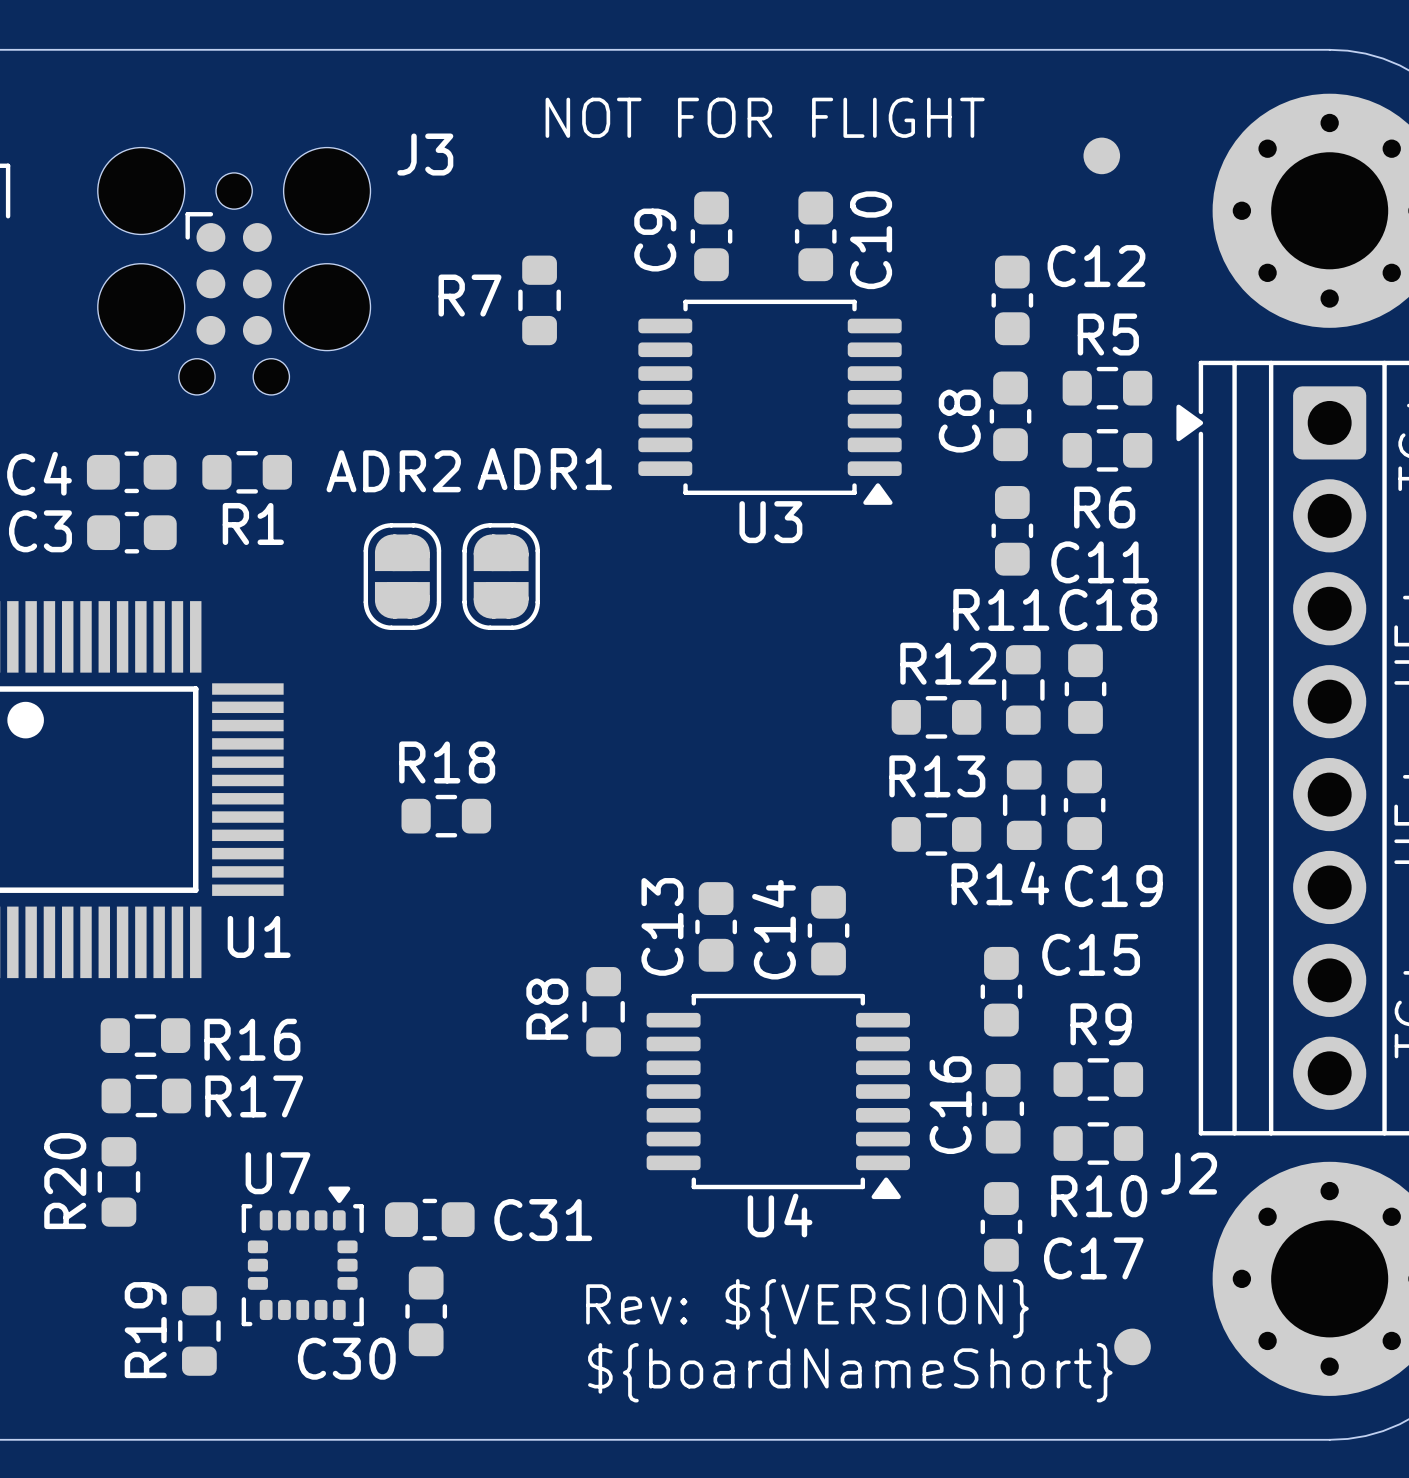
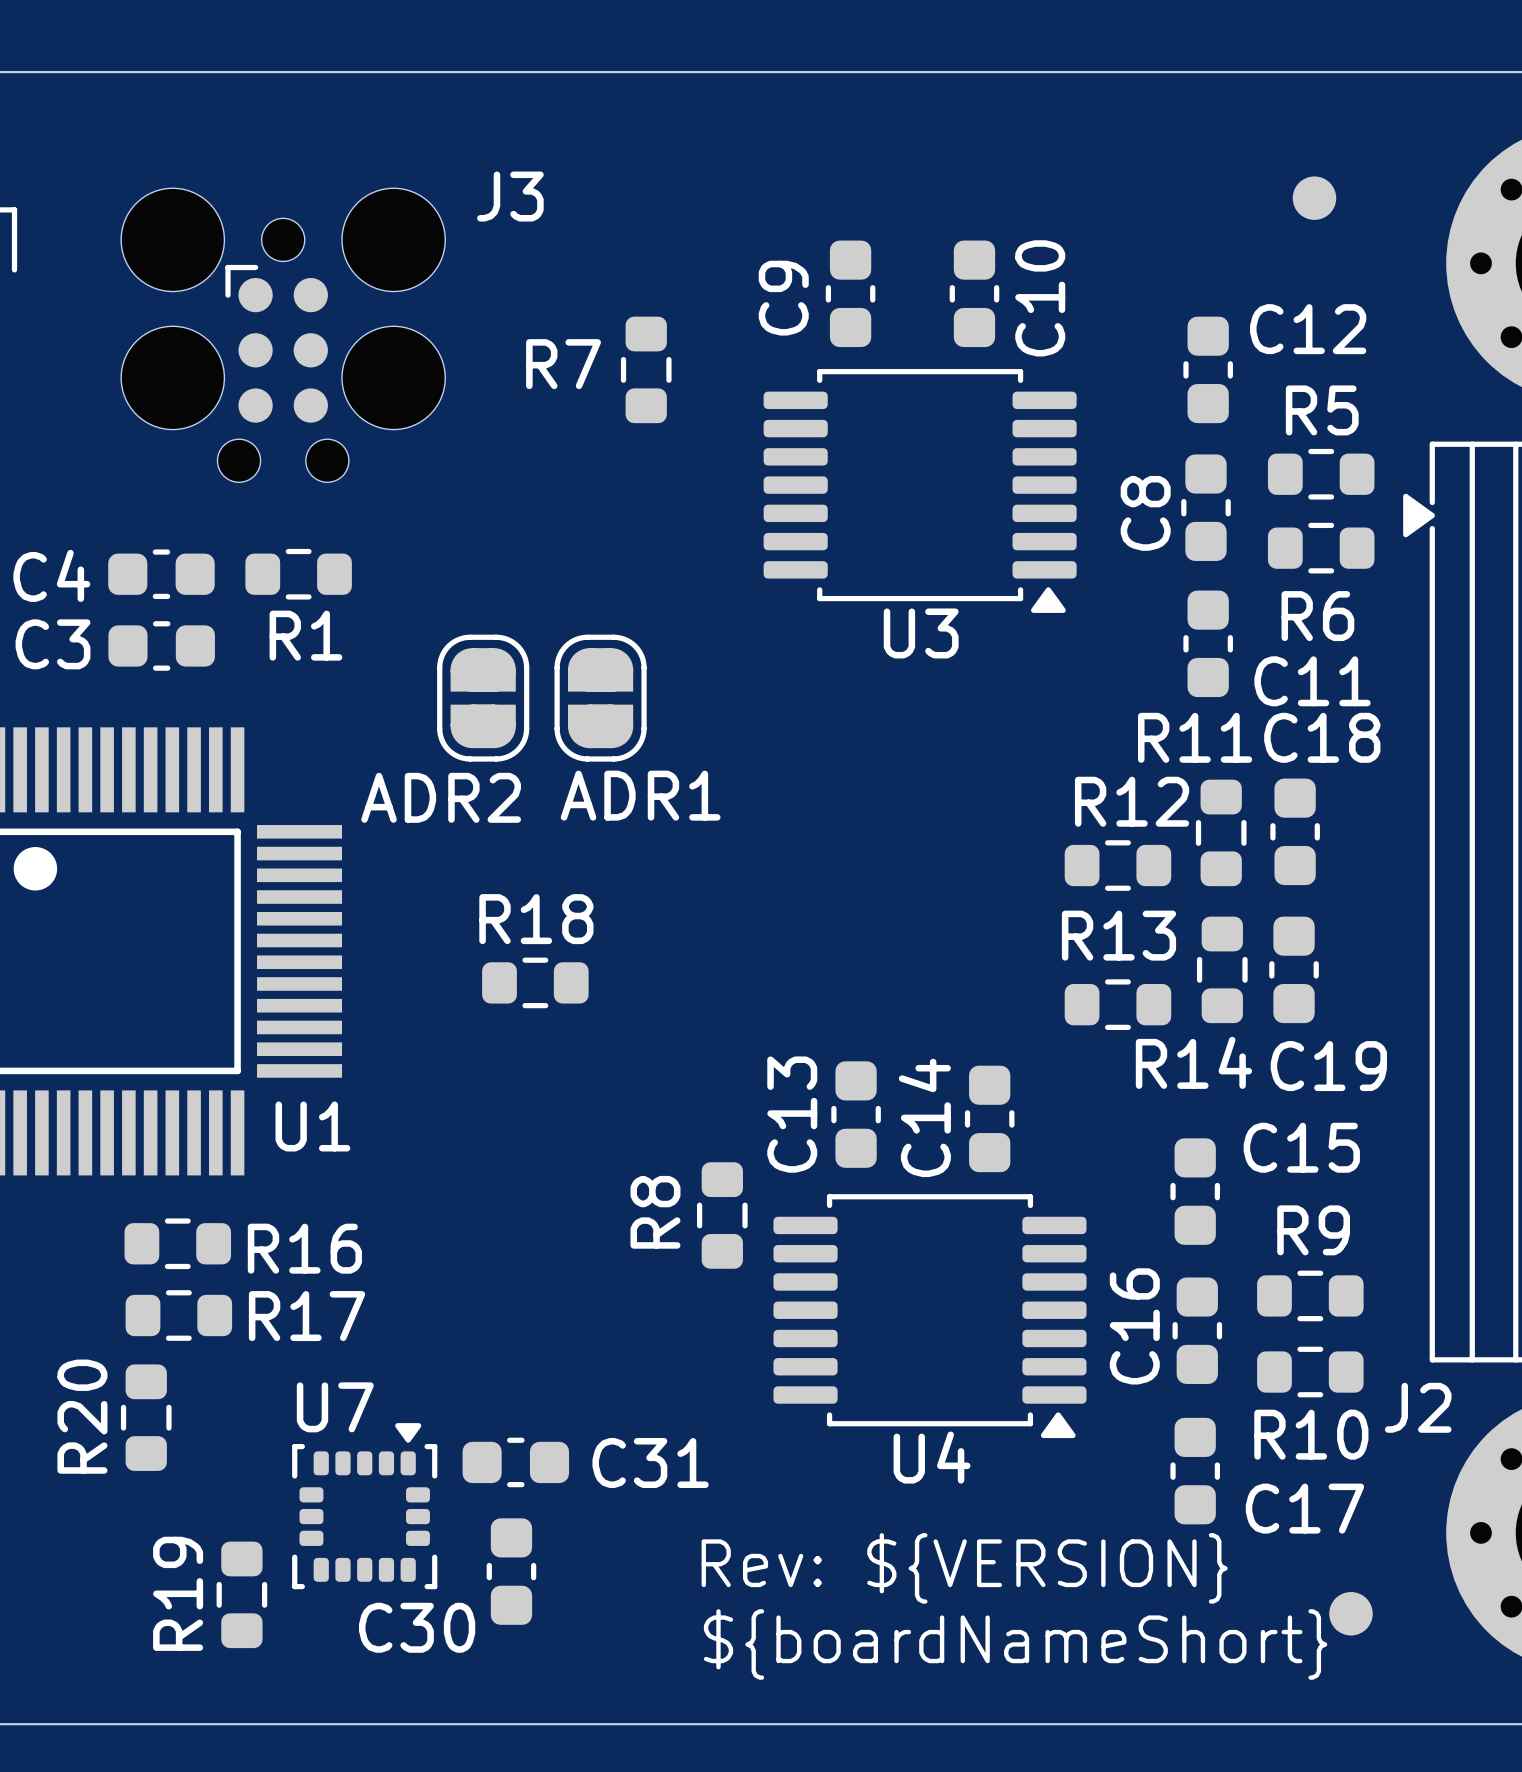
text: NOT FOR FLIGHT (765, 117) -> none
ADR1 name position: ADR1 (544, 469) -> ADR1 (640, 795)
ADR2 name position: ADR2 (393, 471) -> ADR2 (441, 797)

